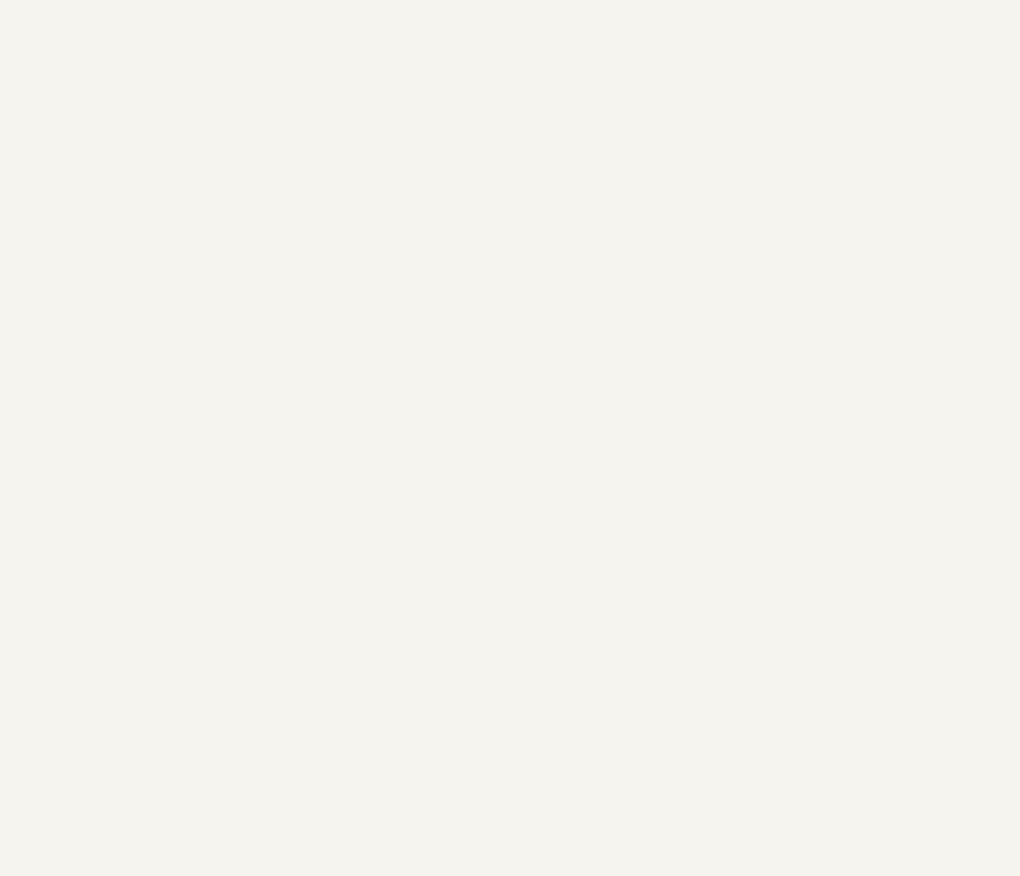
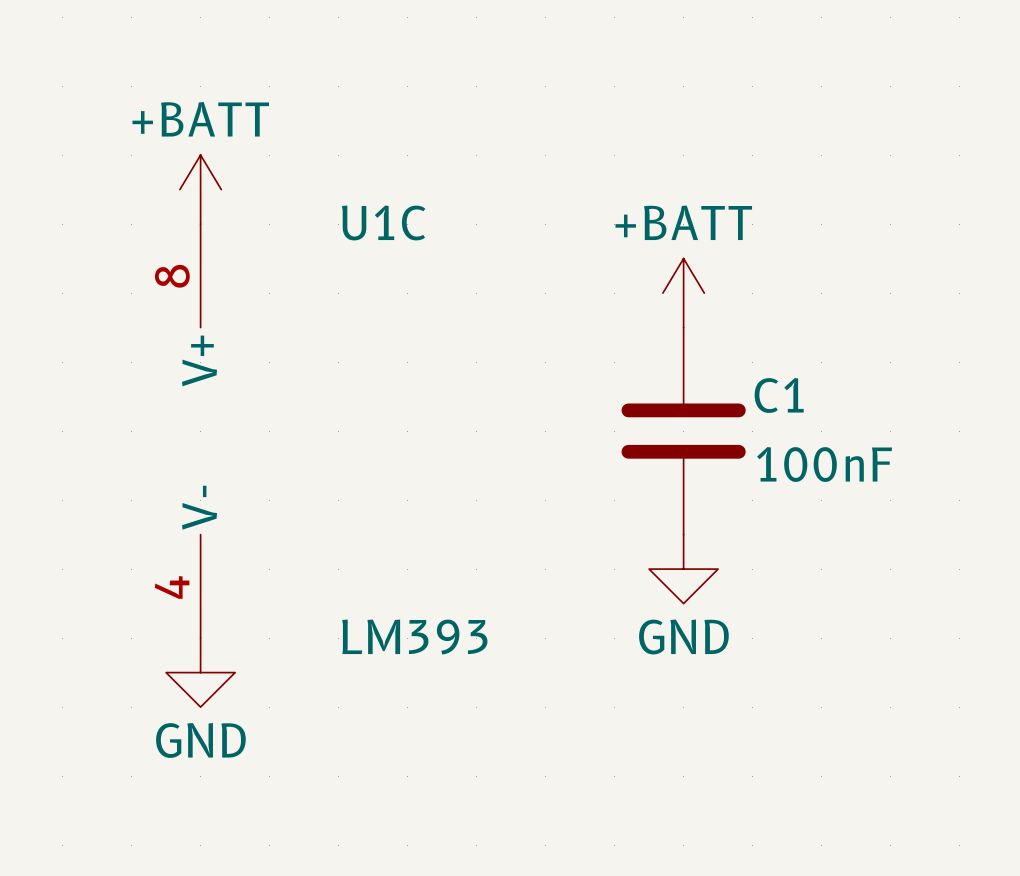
power symbol: none -> +BATT (200, 189)
power symbol: none -> +BATT (683, 293)
U1C: none -> LM393 (200, 431)
C1: none -> 100nF (683, 431)
power symbol: none -> GND (683, 569)
power symbol: none -> GND (200, 672)

